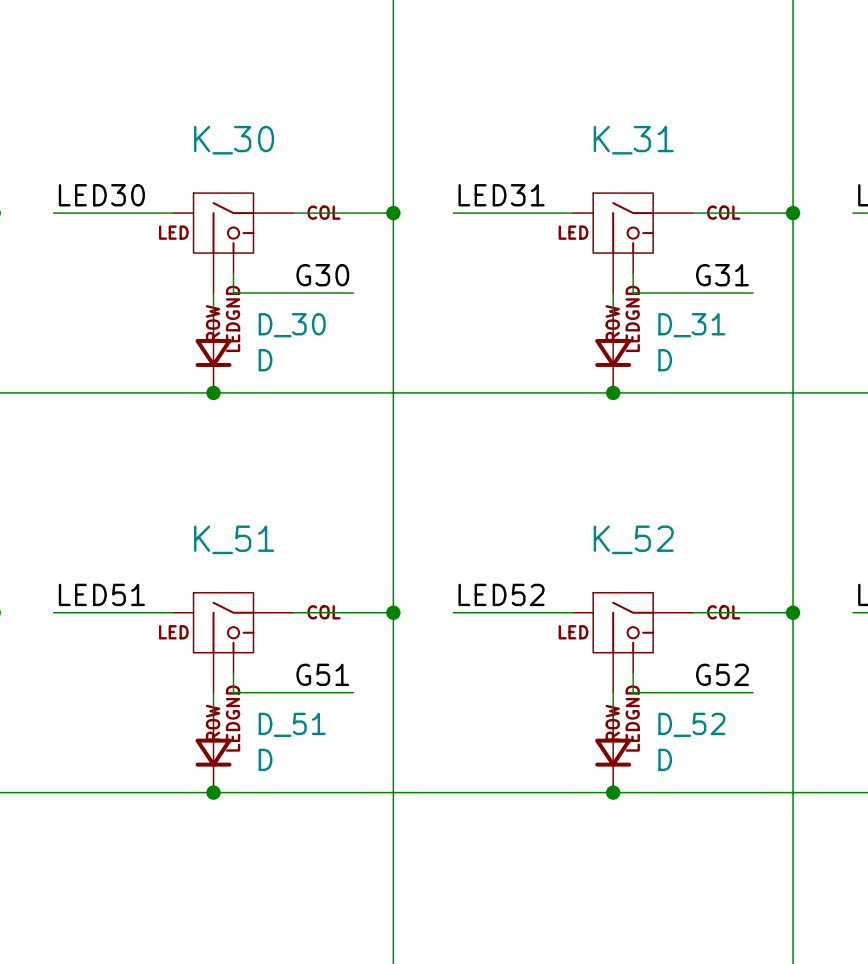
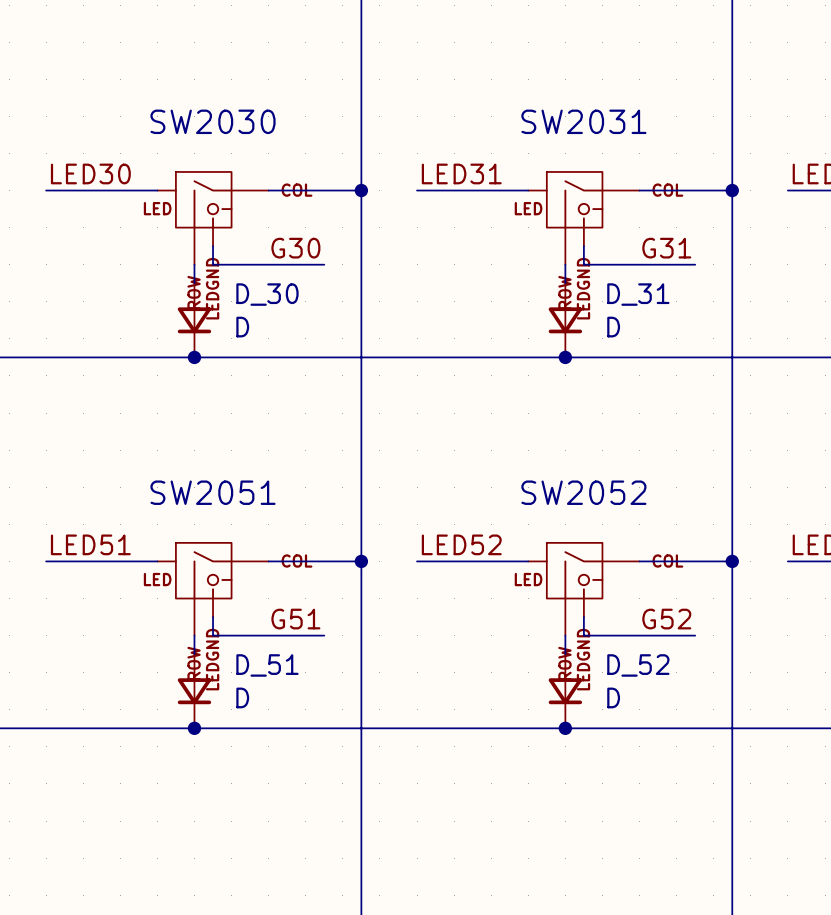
K_30 name: K_30 (234, 140) -> SW2030 (213, 121)
K_31 name: K_31 (633, 140) -> SW2031 (583, 121)
K_51 name: K_51 (234, 539) -> SW2051 (213, 492)
K_52 name: K_52 (633, 539) -> SW2052 (583, 492)

